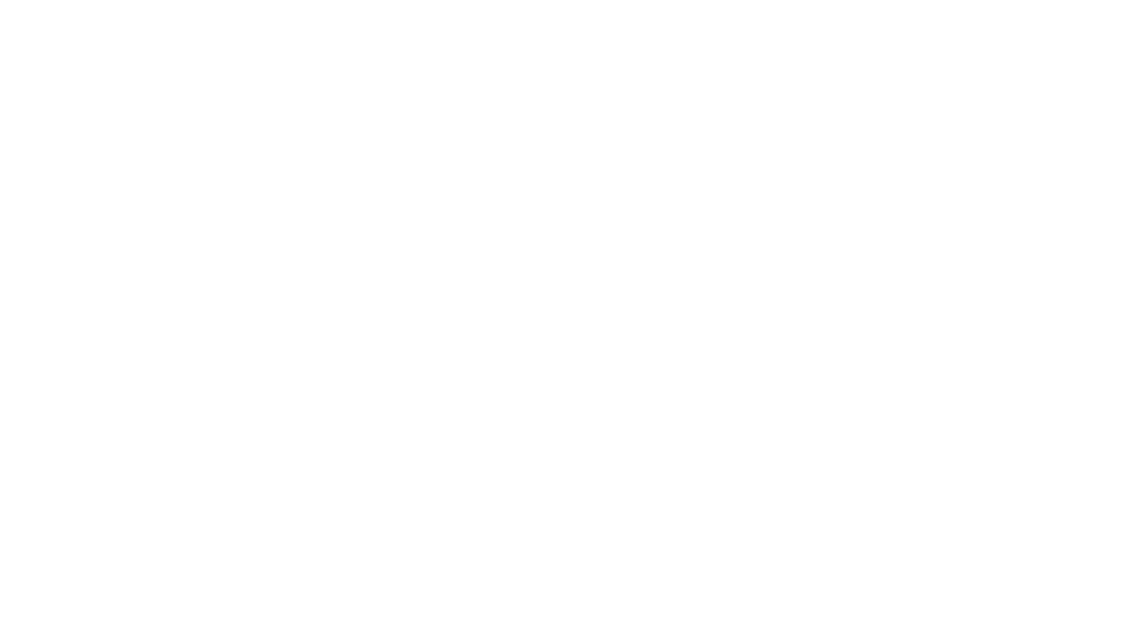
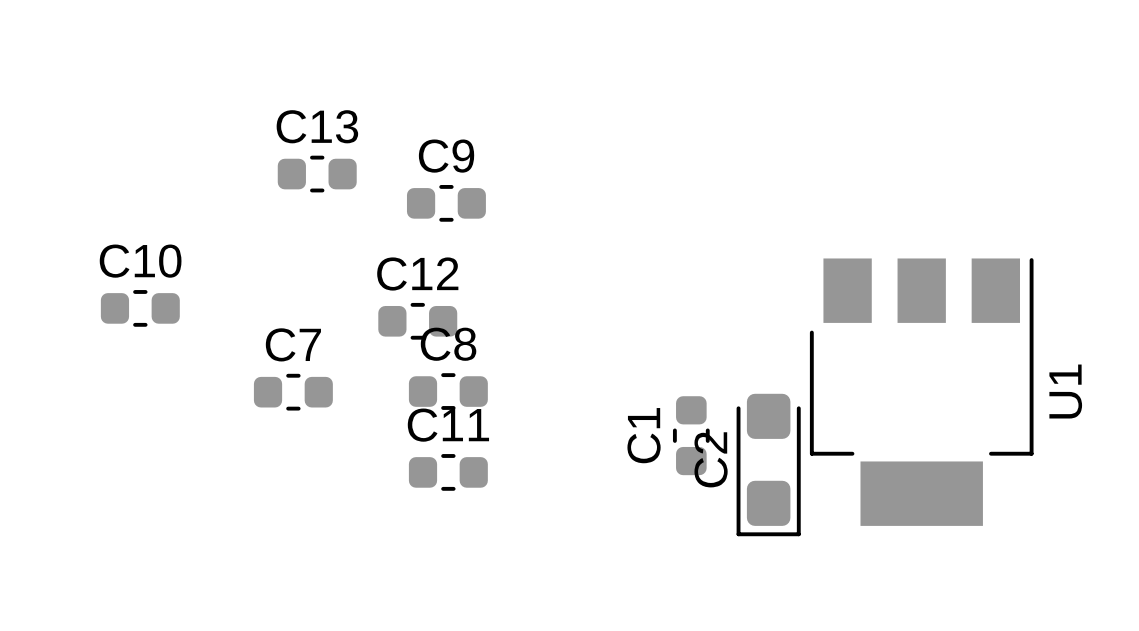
C13: none -> (317, 174)
C9: none -> (446, 203)
C10: none -> (140, 308)
C12: none -> (417, 321)
C8: none -> (448, 391)
C7: none -> (293, 392)
U1: none -> (921, 392)
C1: none -> (691, 435)
C2: none -> (768, 465)
C11: none -> (448, 472)

